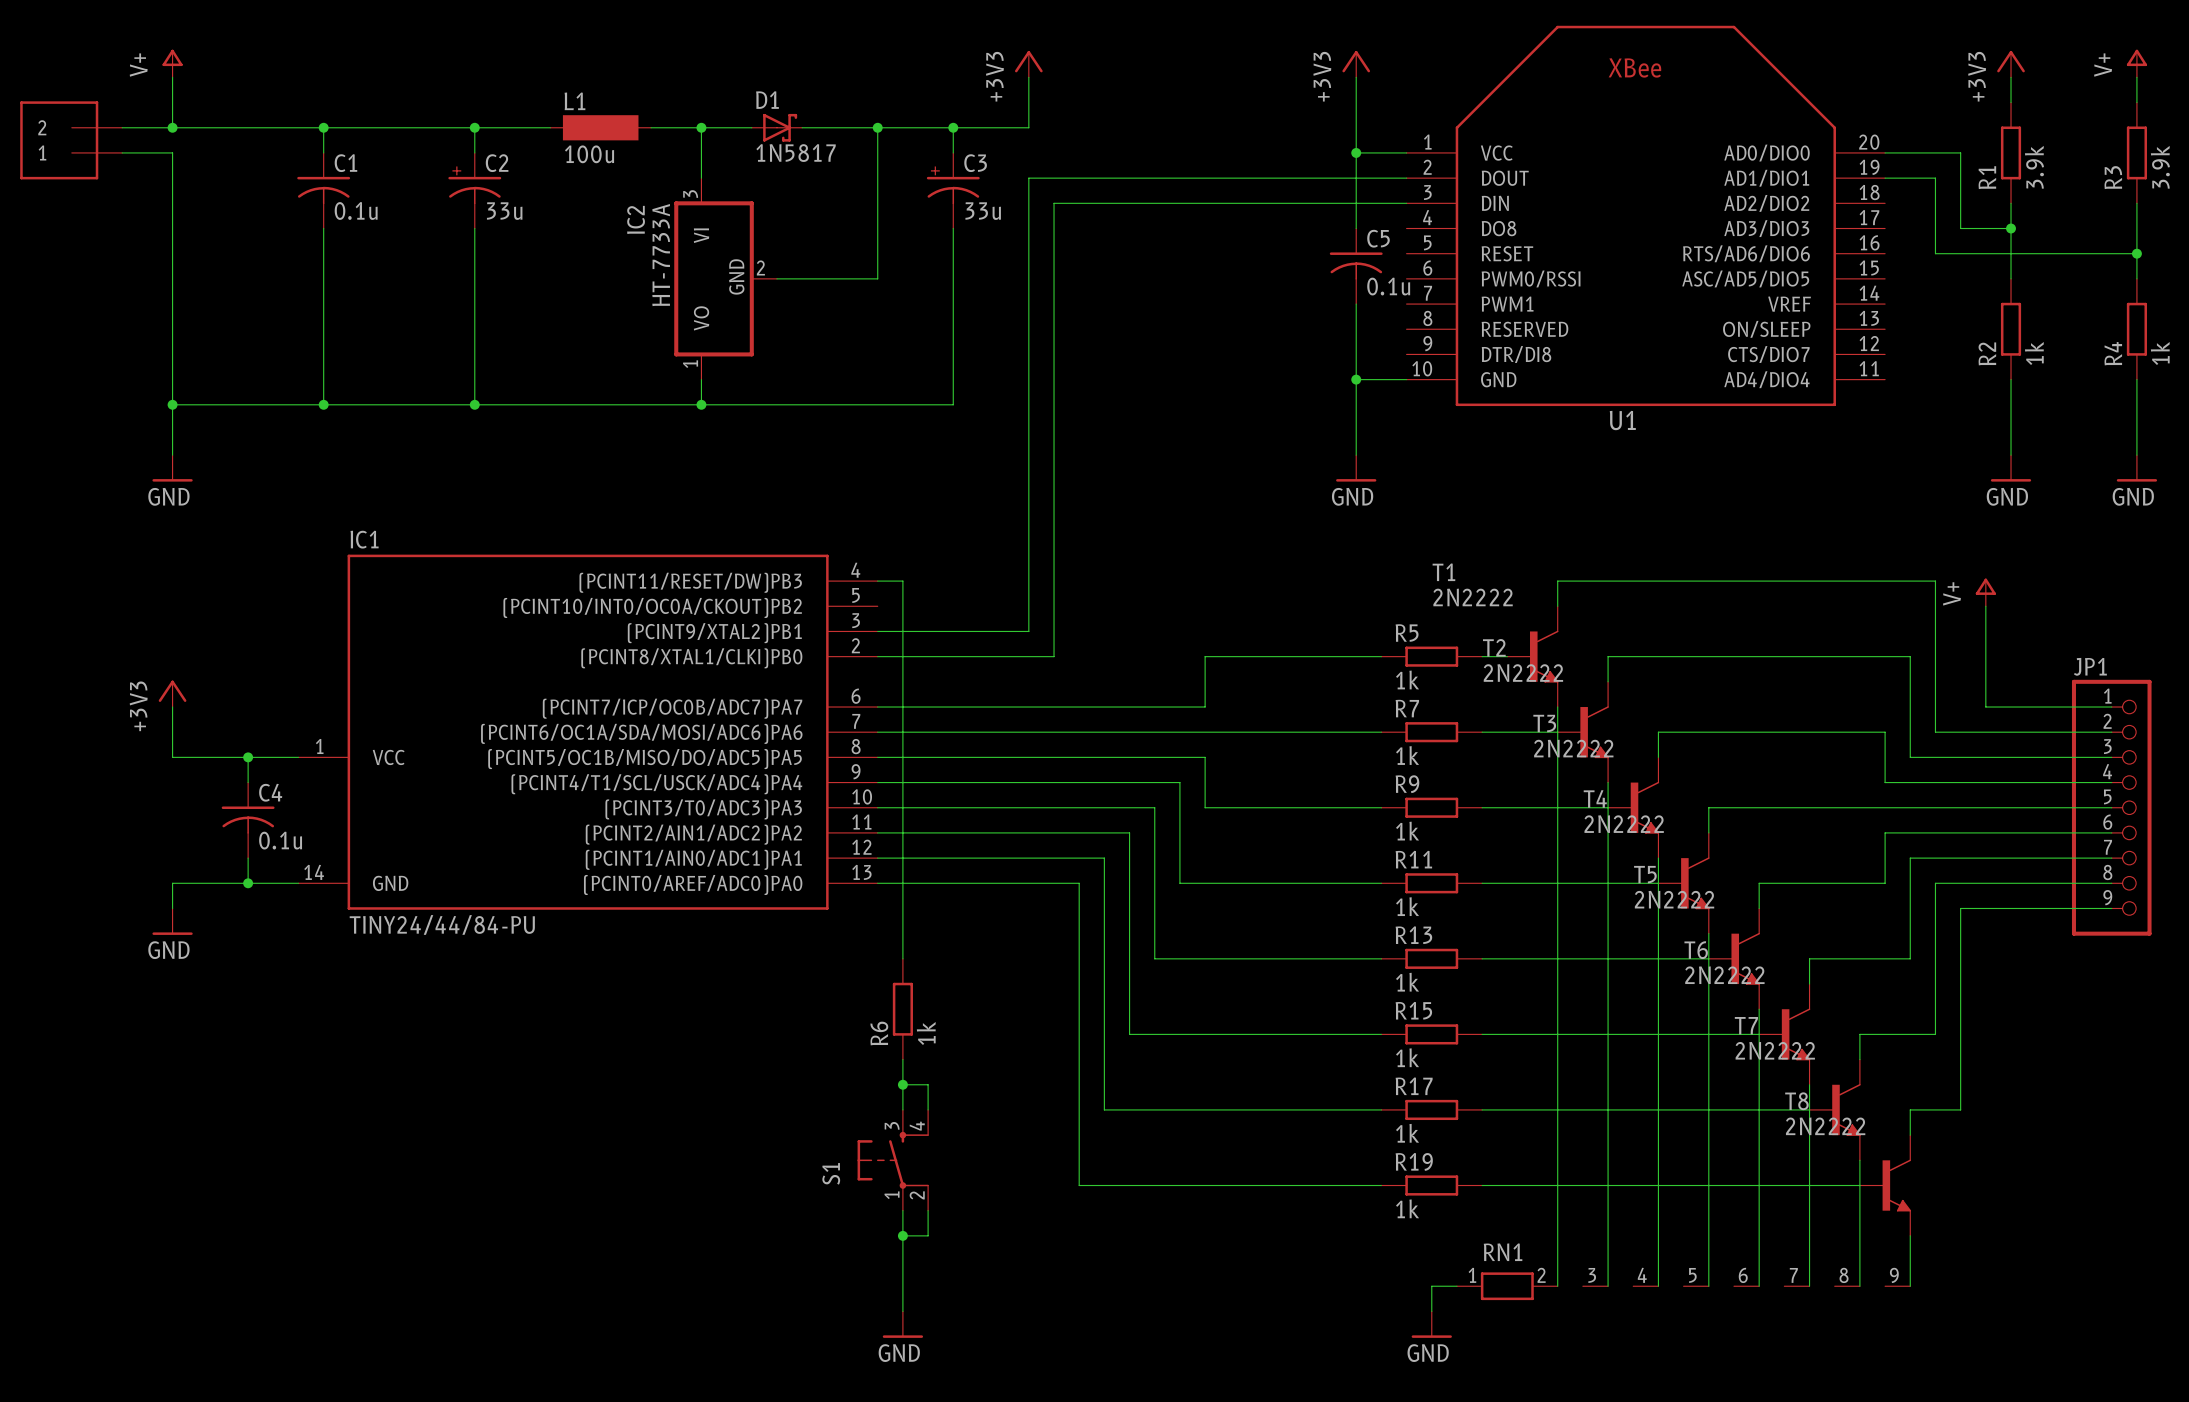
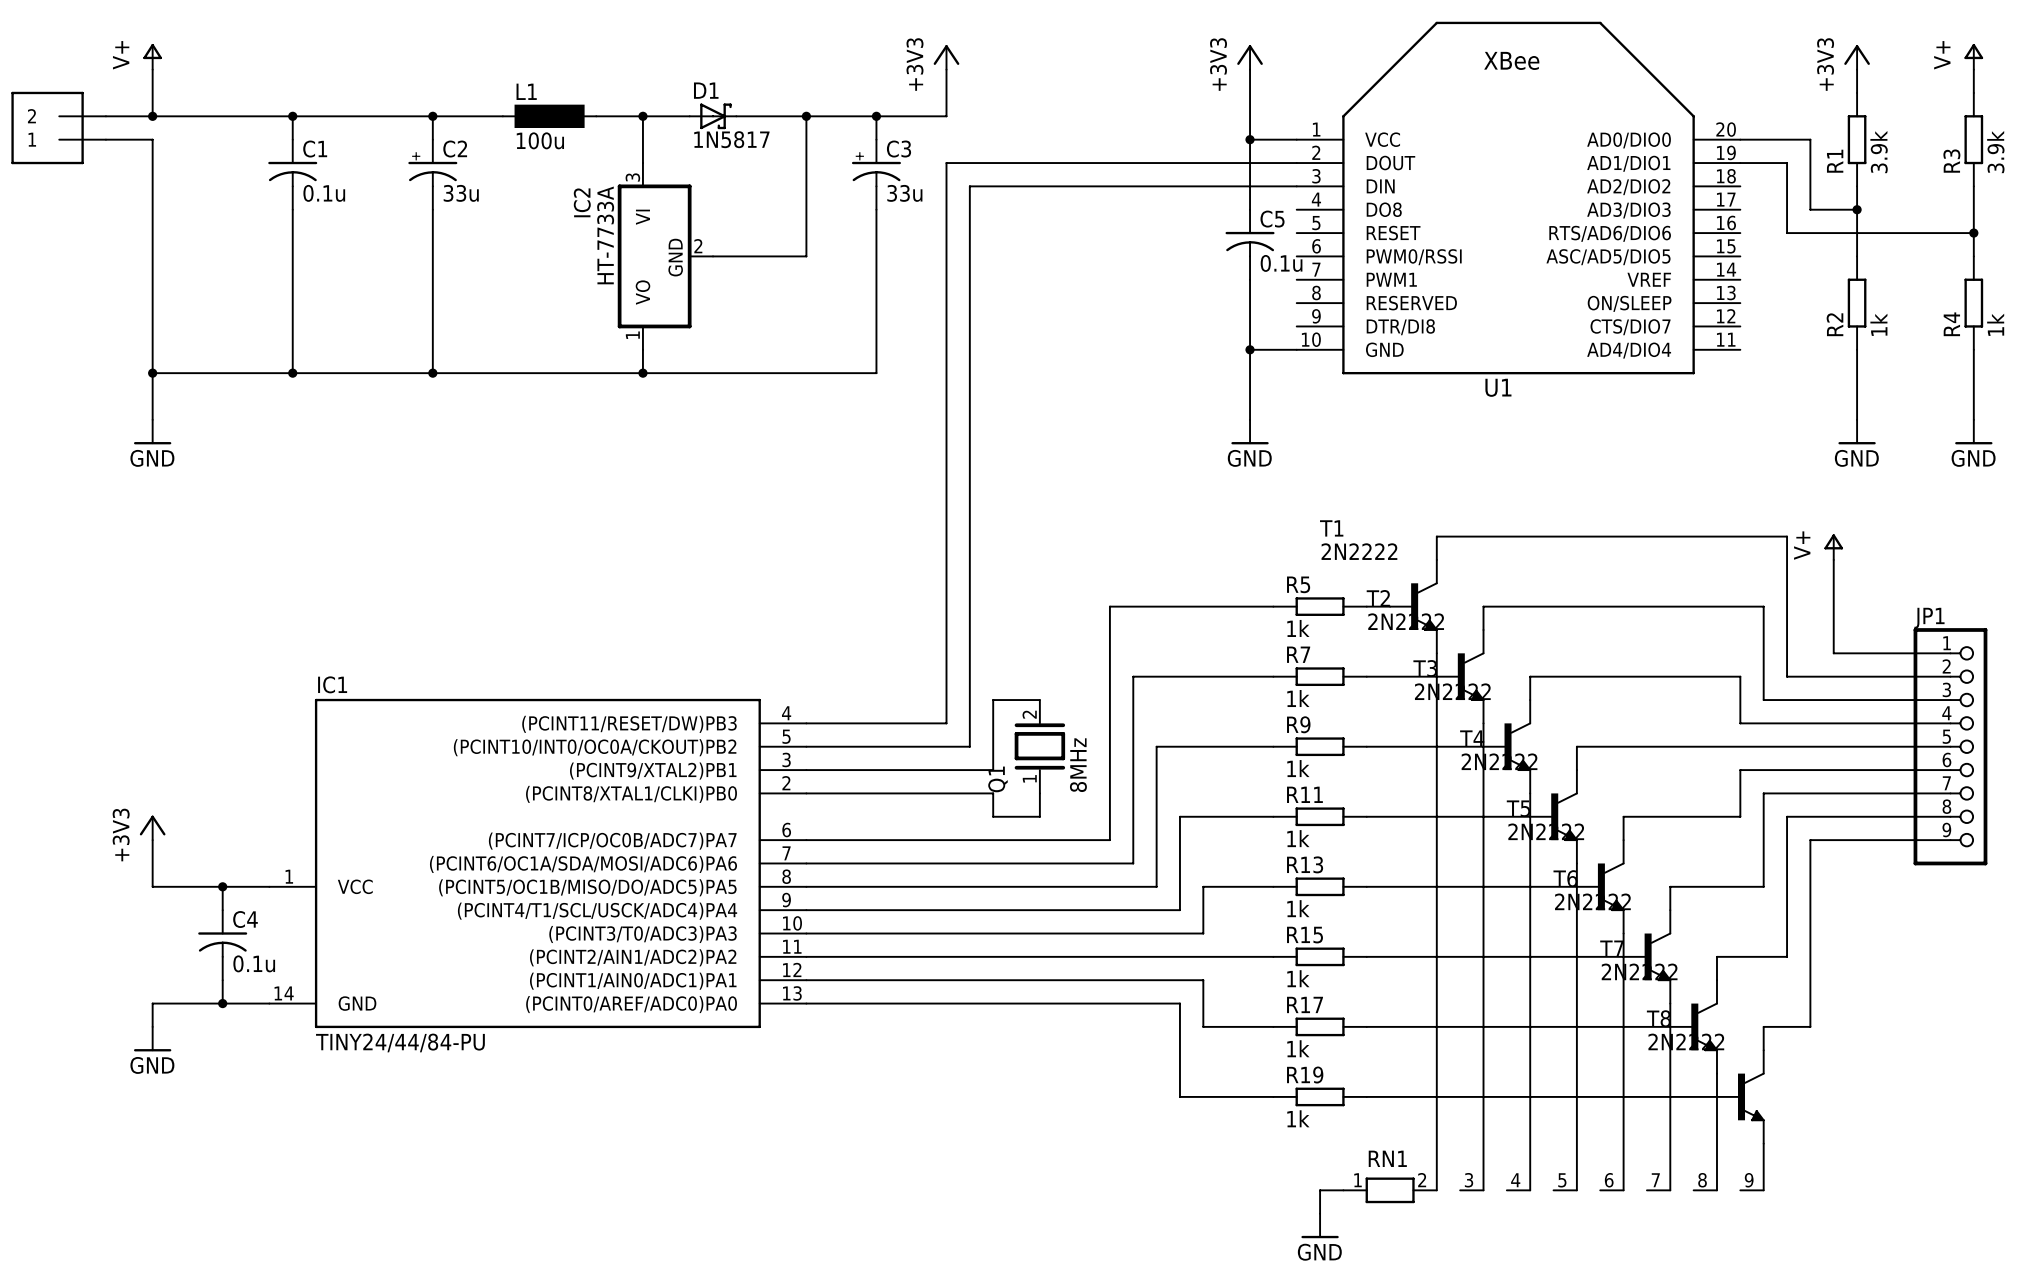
wire: (877, 581) (902, 581) (902, 958) -> none
wire: (877, 631) (1028, 631) -> (946, 723) (946, 583)
wire: (877, 656) (1054, 656) -> (969, 746) (969, 606)
power symbol position: +3V3 (172, 693) -> +3V3 (152, 827)
wire: (172, 707) (172, 757) (298, 757) -> none
wire: (877, 707) (1205, 707) -> none
IC1 position: (588, 732) -> (537, 863)
wire: (877, 732) (1230, 732) -> (806, 863) (1133, 863) (1133, 676)
wire: (248, 757) (248, 782) -> (222, 886) (222, 910)
junction: (248, 757) -> none
wire: (877, 757) (1079, 757) -> none
wire: (1129, 757) (1205, 757) -> (1109, 653) (1109, 700)
wire: (1028, 782) (1179, 782) (1179, 883) (1280, 883) -> (806, 910) (1179, 910) (1179, 816)
wire: (1054, 807) (1154, 807) (1154, 958) -> (806, 886) (1063, 886)
Q1: none -> 8MHz (1039, 746)
wire: (1205, 807) (1255, 807) -> (1109, 746) (1109, 840) (806, 840)
C4 position: (248, 820) -> (222, 945)
wire: (1079, 832) (1129, 832) (1129, 858) -> (993, 770) (993, 700)
wire: (248, 858) (248, 883) -> (222, 980) (222, 1003)
wire: (1079, 858) (1104, 858) (1104, 1109) (1305, 1109) -> (806, 980) (1203, 980) (1203, 1026)
junction: (248, 883) -> none
wire: (298, 883) (172, 883) (172, 908) -> (269, 886) (152, 886) (152, 840)
wire: (877, 883) (1079, 883) (1079, 1185) (1280, 1185) -> (853, 1003) (1179, 1003) (1179, 1096)
wire: (1129, 883) (1129, 1034) -> (1039, 816) (993, 816) (993, 793)
power symbol position: GND (172, 921) -> GND (152, 1039)
junction: none -> (222, 886)
wire: (1255, 958) (1305, 958) -> (1156, 886) (1156, 746)
wire: none -> (1203, 886) (1203, 933) (806, 933)
R6: 1k (902, 1009) -> none
wire: none -> (806, 956) (1039, 956)
wire: (902, 1059) (902, 1109) -> none
junction: none -> (222, 1003)
wire: none -> (269, 1003) (152, 1003) (152, 1026)
wire: none -> (806, 1003) (829, 1003)
junction: (902, 1084) -> none
wire: (928, 1084) (928, 1109) -> none
S1: (893, 1160) -> none
wire: (902, 1210) (902, 1311) -> none
wire: (928, 1210) (928, 1235) (902, 1235) -> none
junction: (902, 1235) -> none
power symbol: GND (902, 1324) -> none

